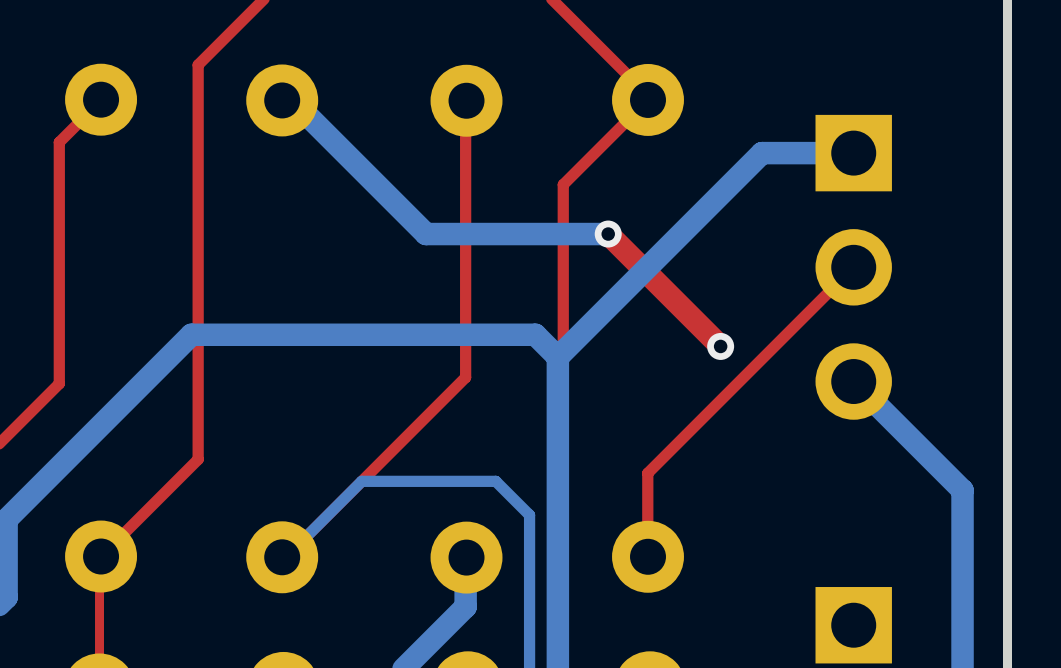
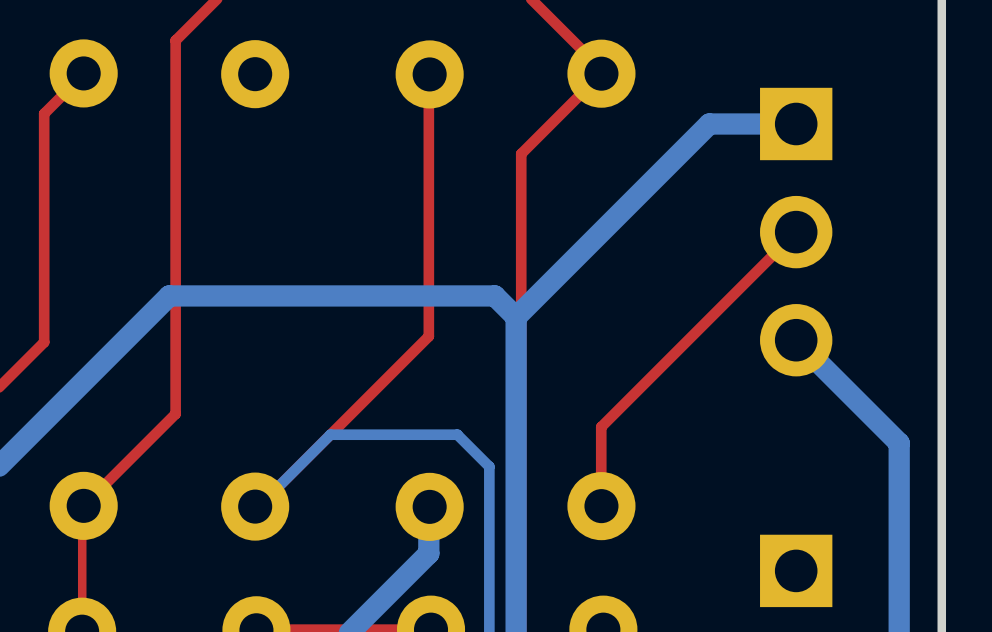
bottom track: (282, 100) (285, 97) (289, 97) (426, 234) (608, 234) -> none
top track: (608, 234) (720, 346) -> none
via: (608, 234) -> none
via: (720, 346) -> none

